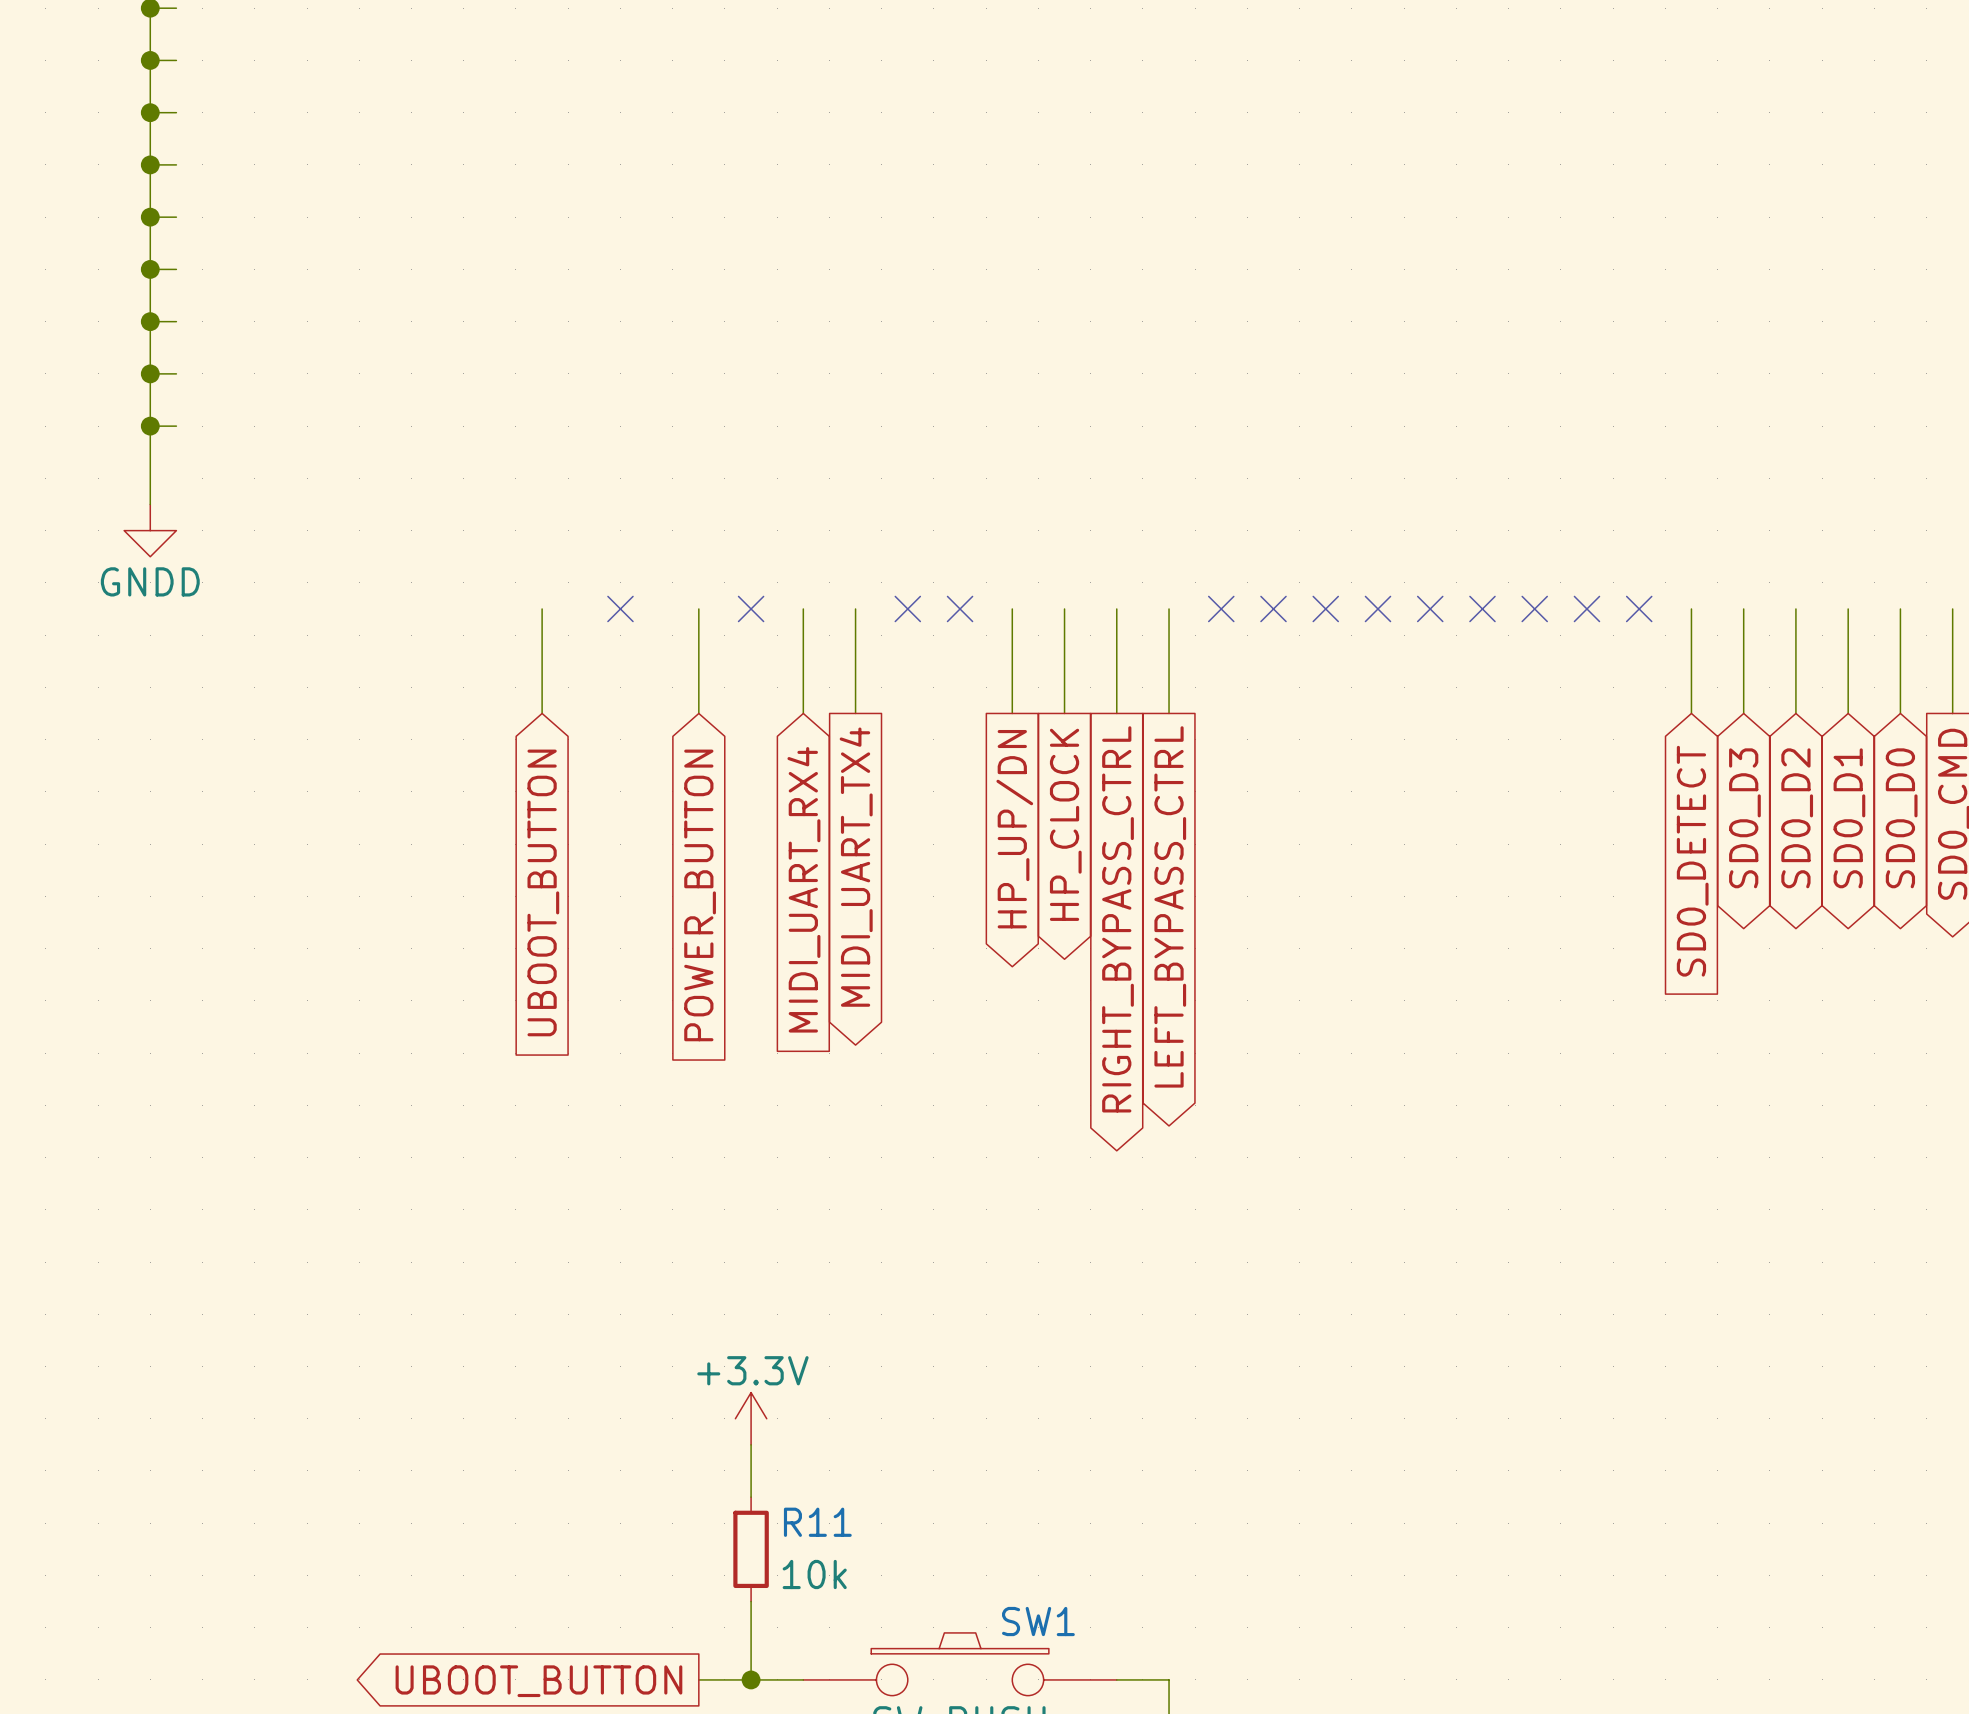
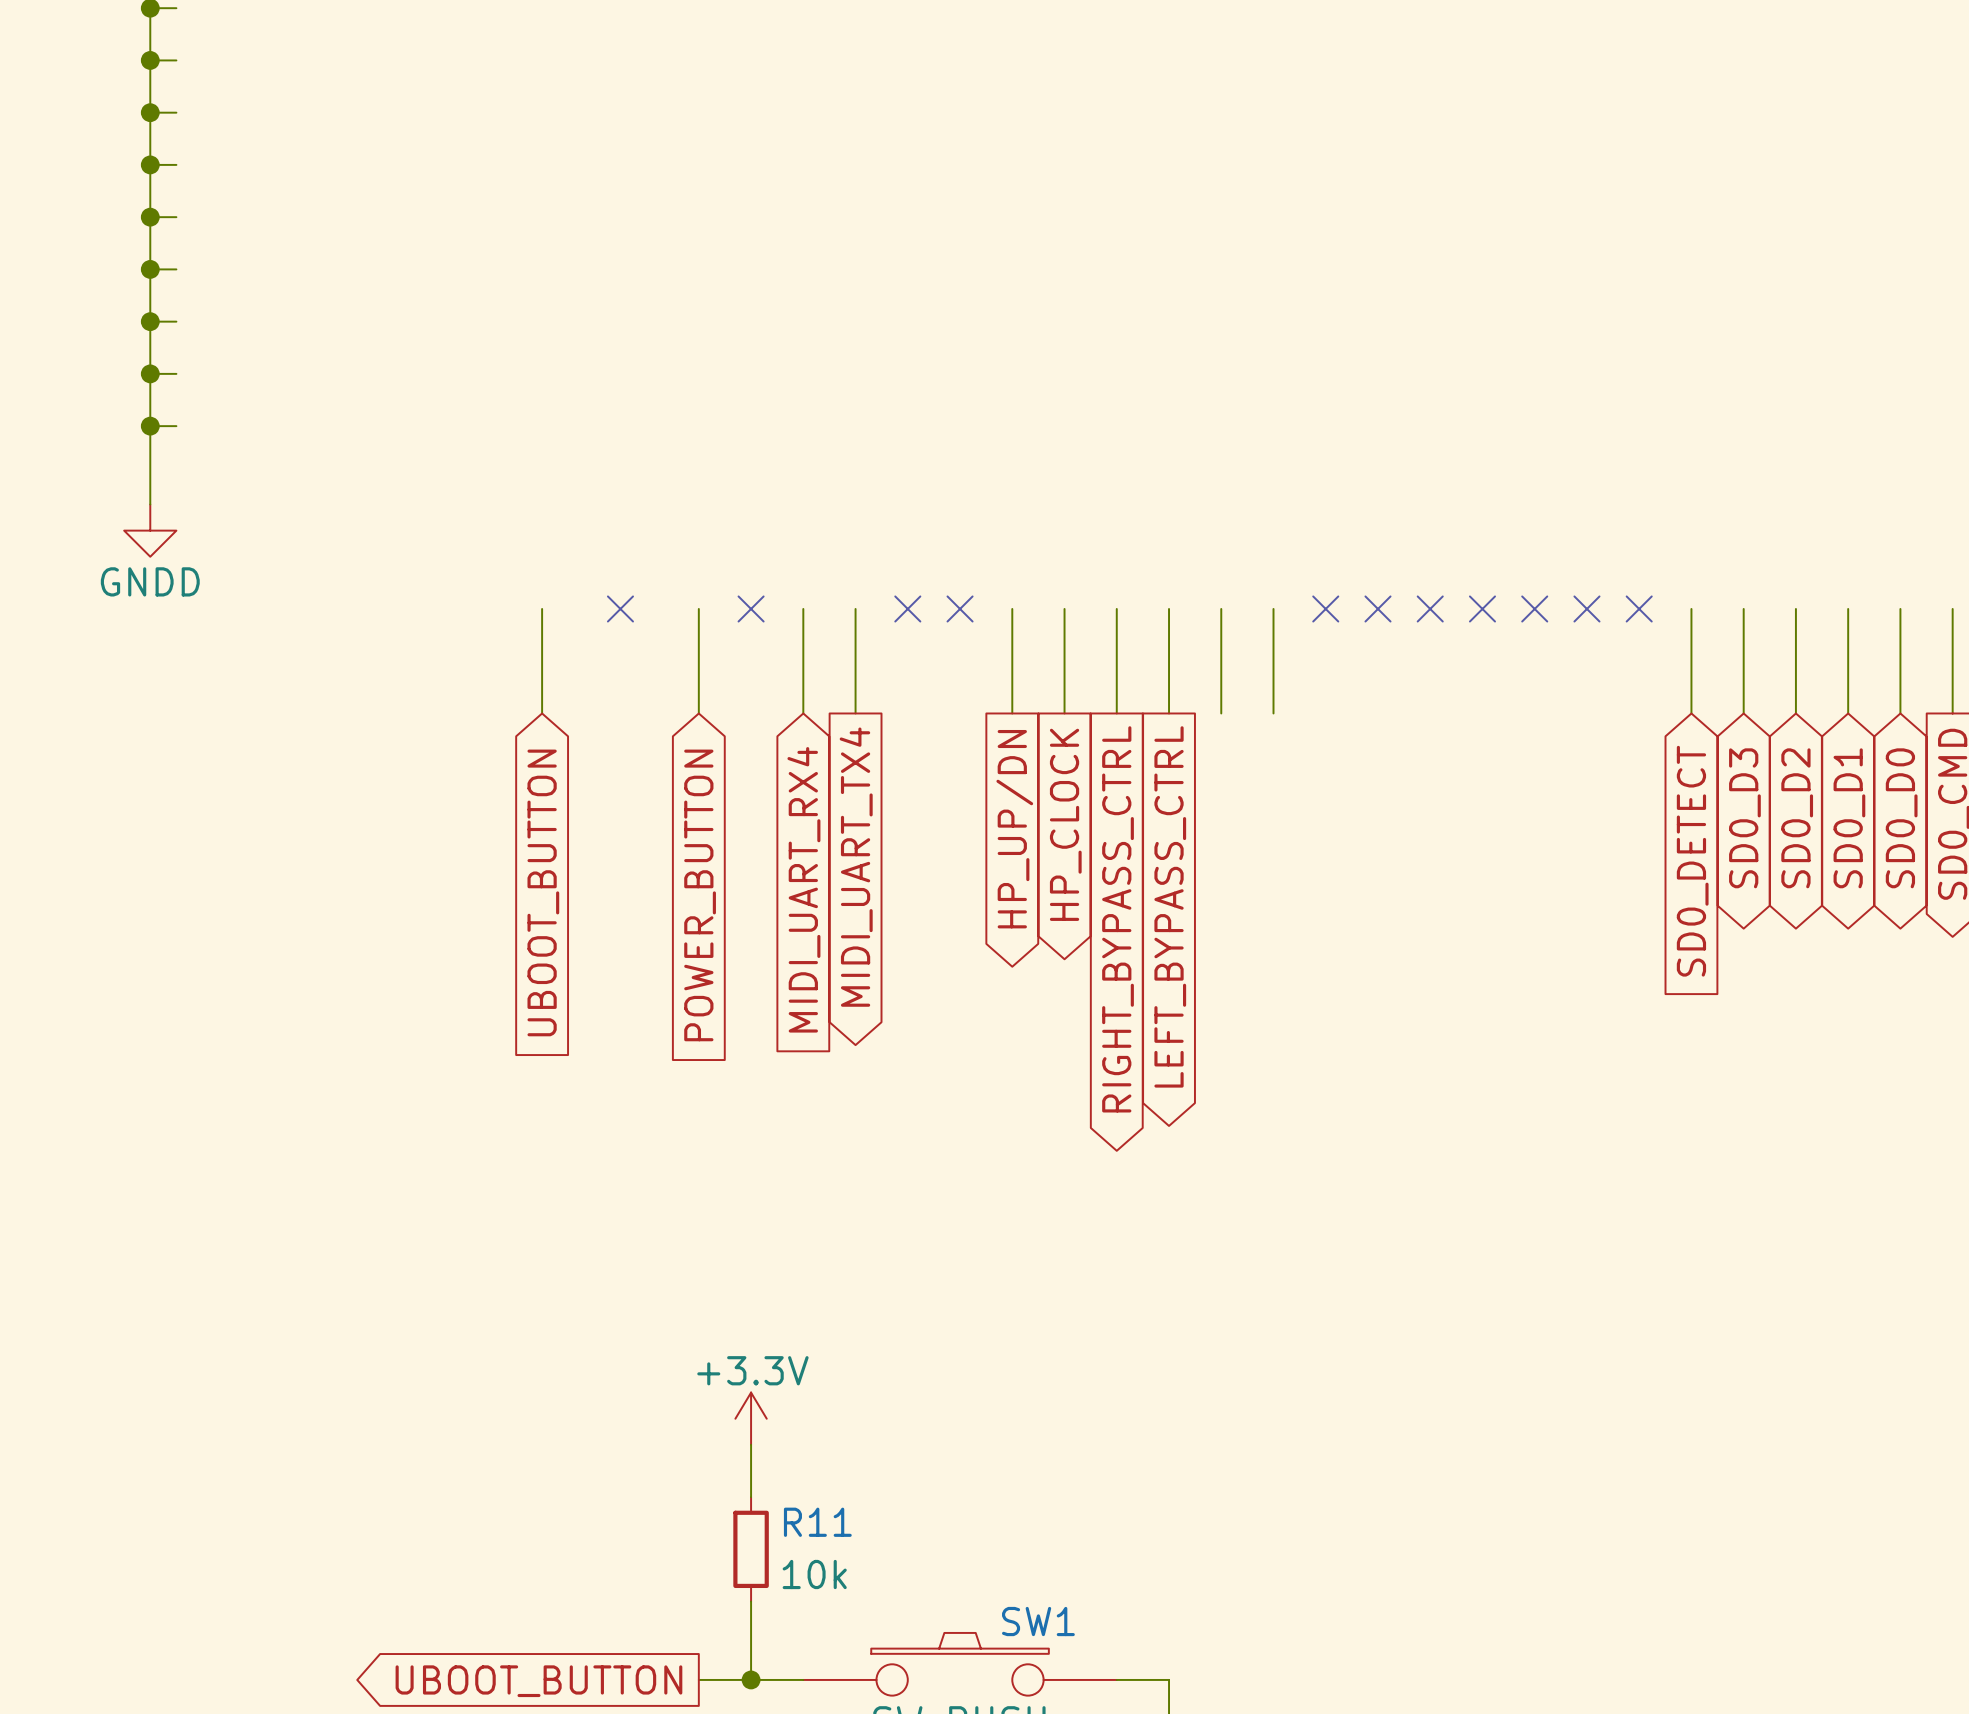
wire: none -> (1221, 608) (1221, 713)
no-connect mark: (1221, 608) -> none
wire: none -> (1273, 608) (1273, 713)
no-connect mark: (1273, 608) -> none

